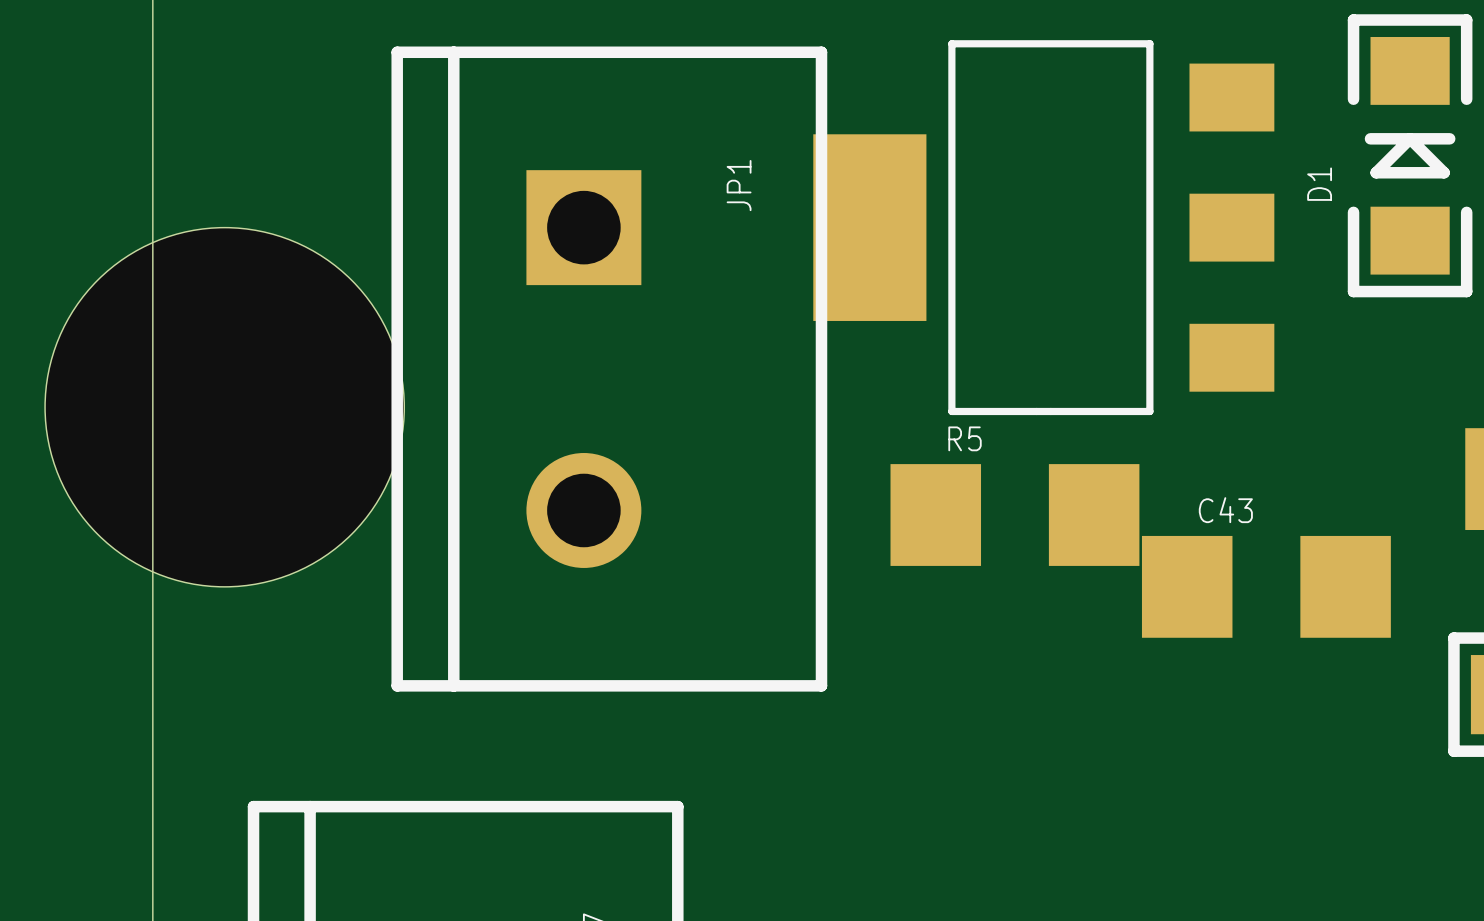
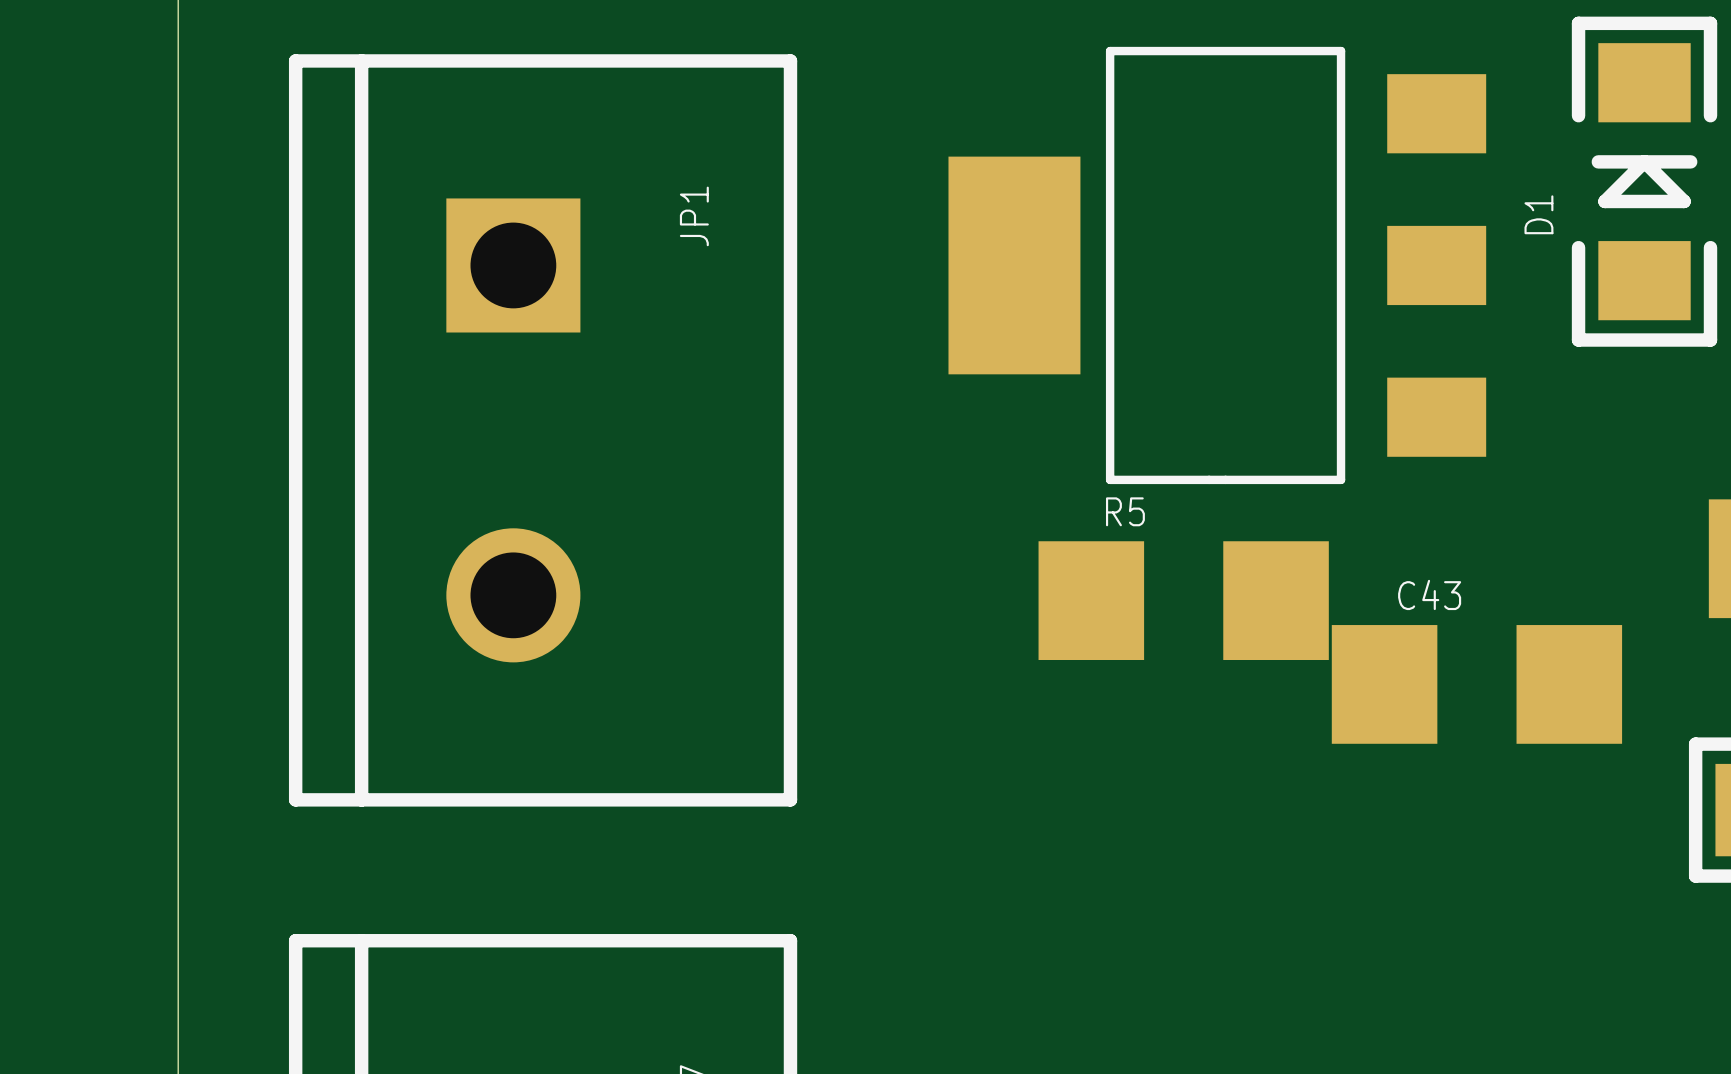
JP1 position: (609, 369) -> (543, 430)
hole: (224, 407) -> none

